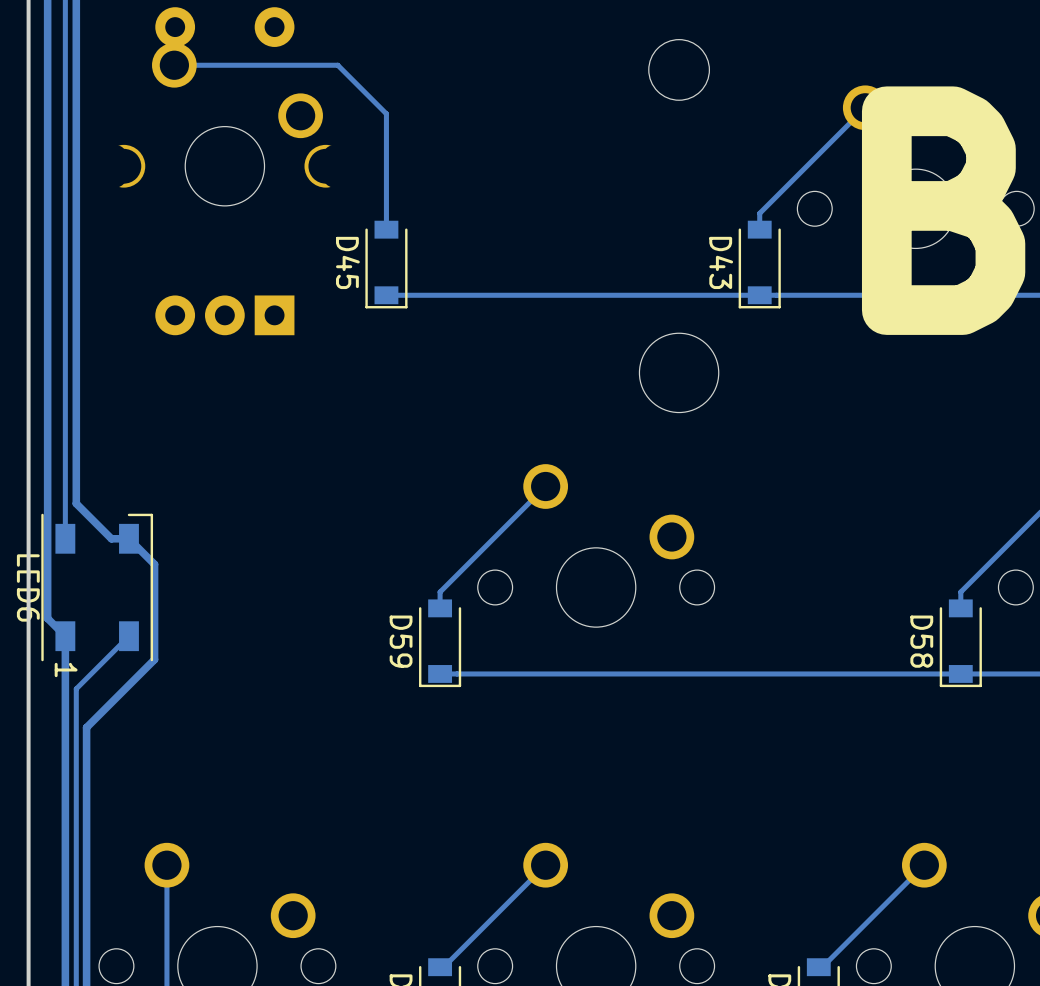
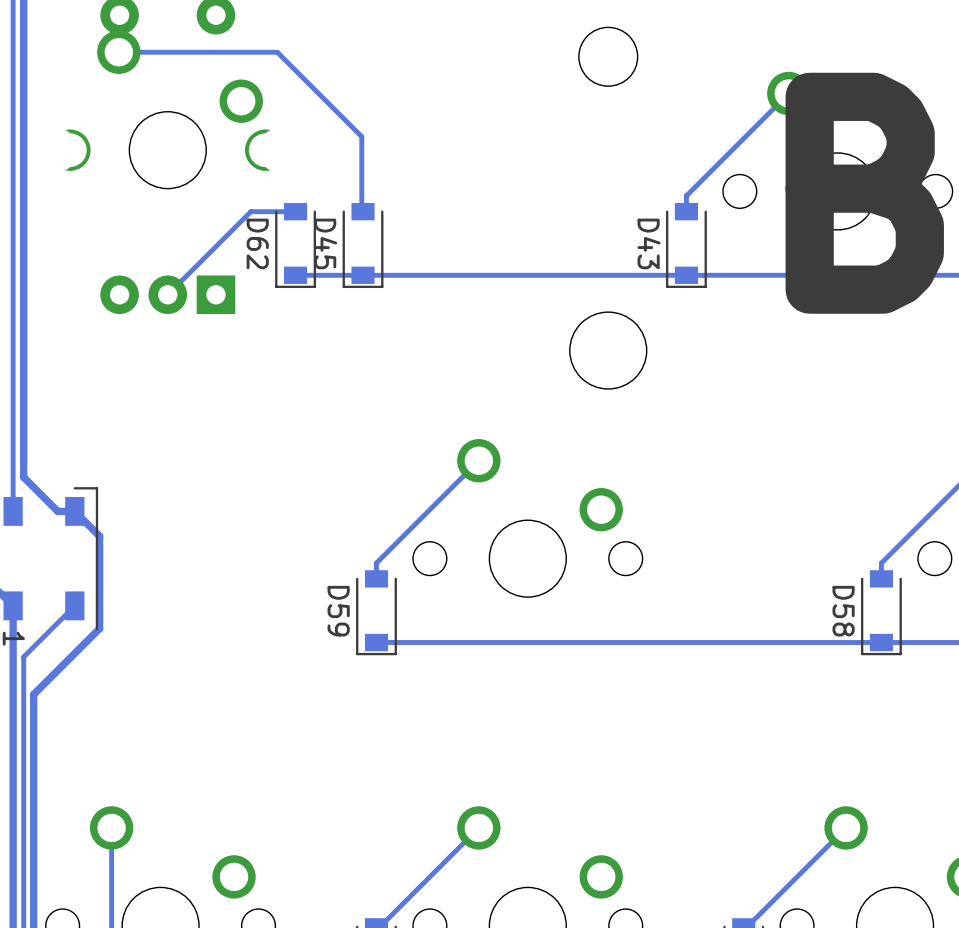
track: (386, 113) (386, 229) -> (324, 99) (361, 136) (361, 211)
track: none -> (295, 211) (250, 211) (167, 294)
D62: none -> (295, 245)
D45 position: (386, 264) -> (363, 245)
track: none -> (324, 275) (295, 275)

